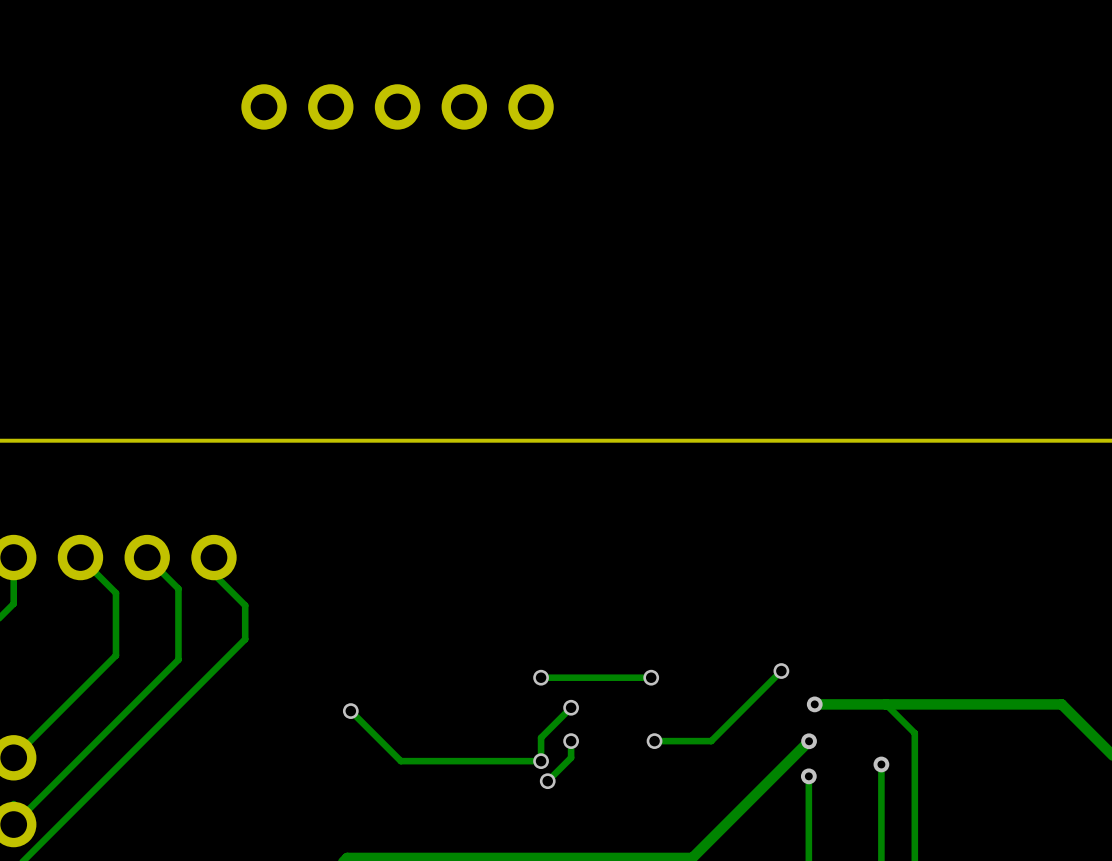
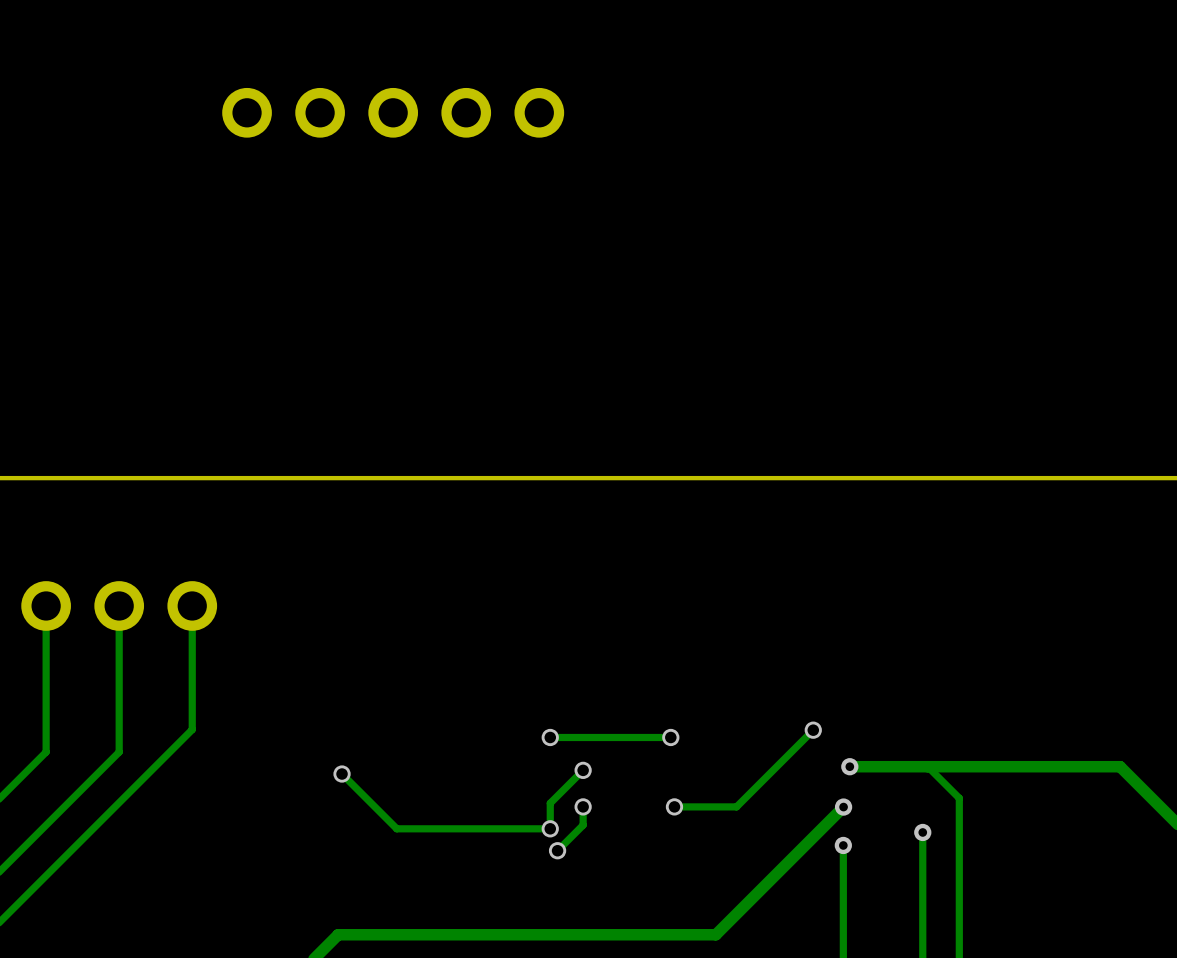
track: (80, 557) (115, 593) (115, 655) (80, 691) -> (46, 605) (46, 752)
track: (147, 557) (178, 588) (178, 659) (147, 691) -> (119, 605) (119, 752)
track: (213, 574) (245, 605) (245, 639) (213, 670) -> (192, 624) (192, 729)

